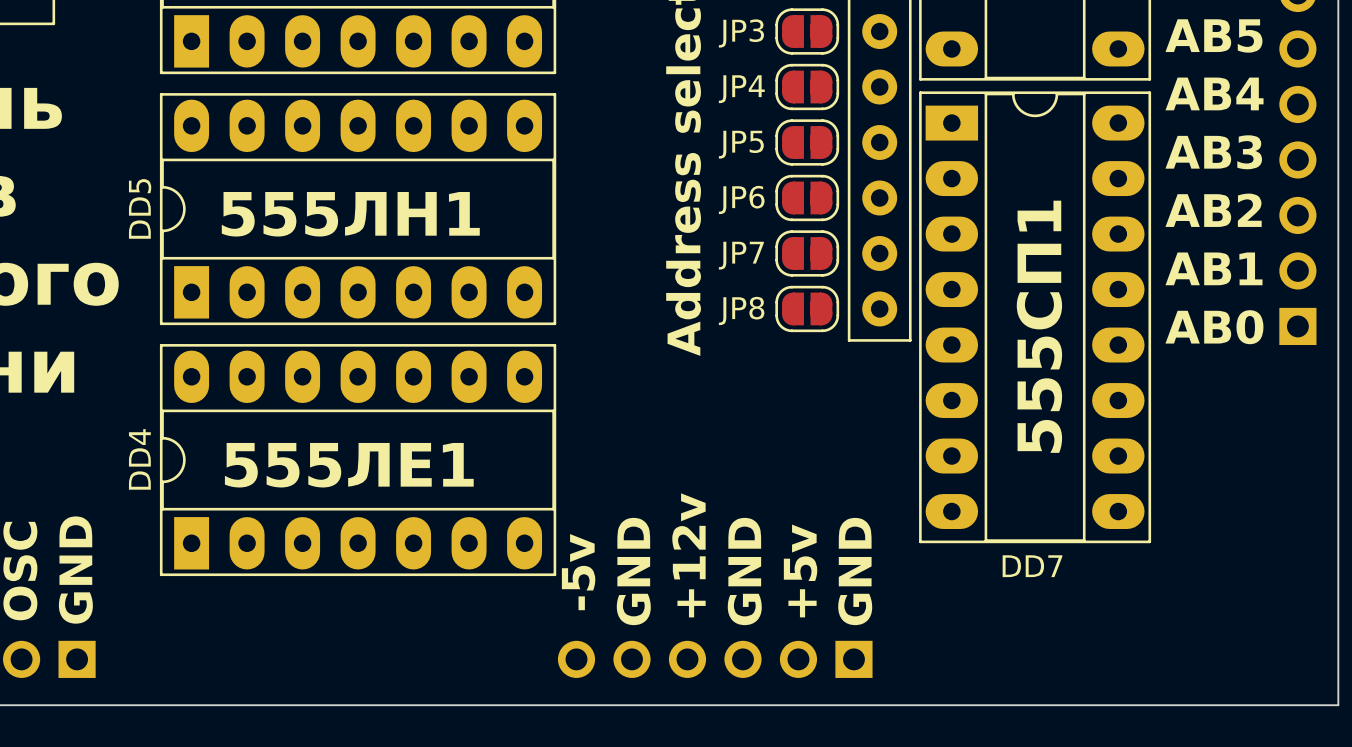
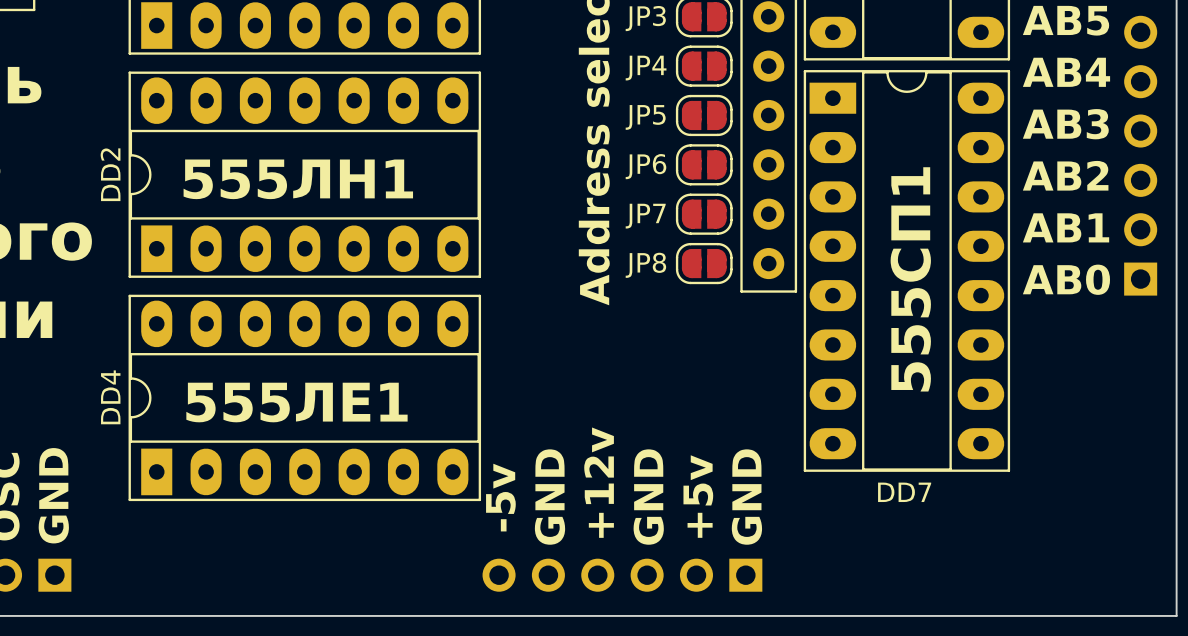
DD5 name: DD5 (140, 208) -> DD2 (110, 174)

